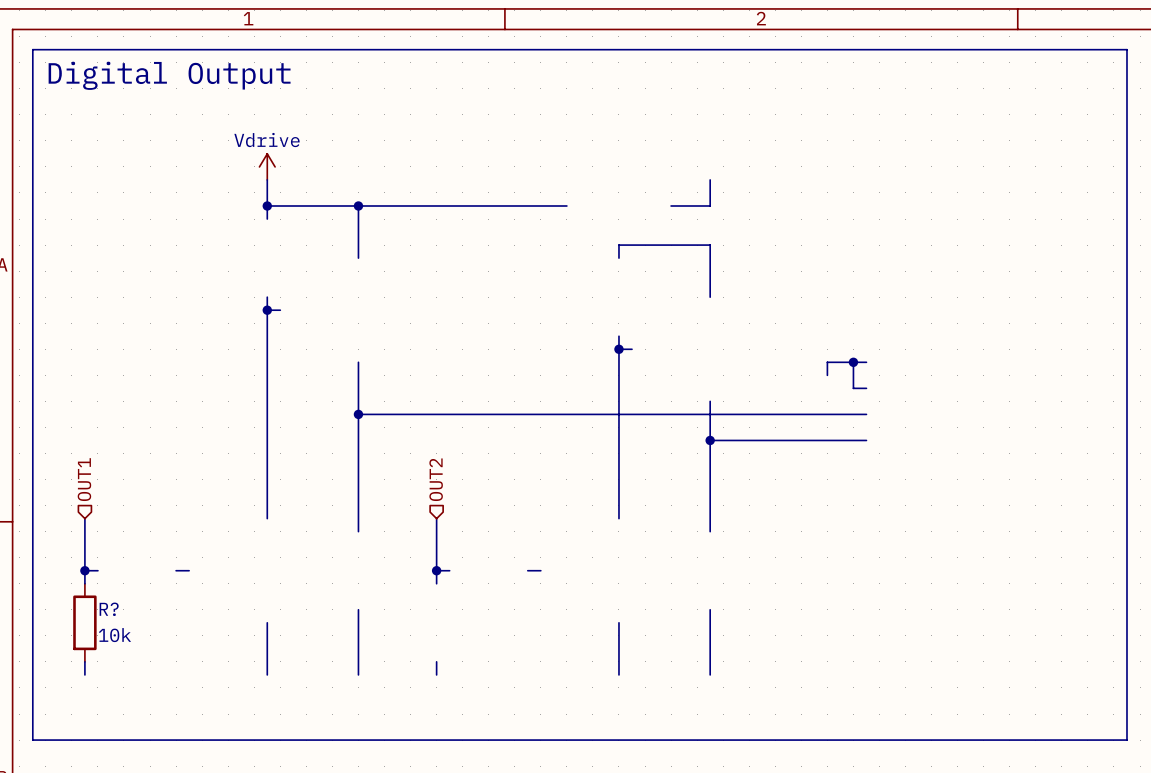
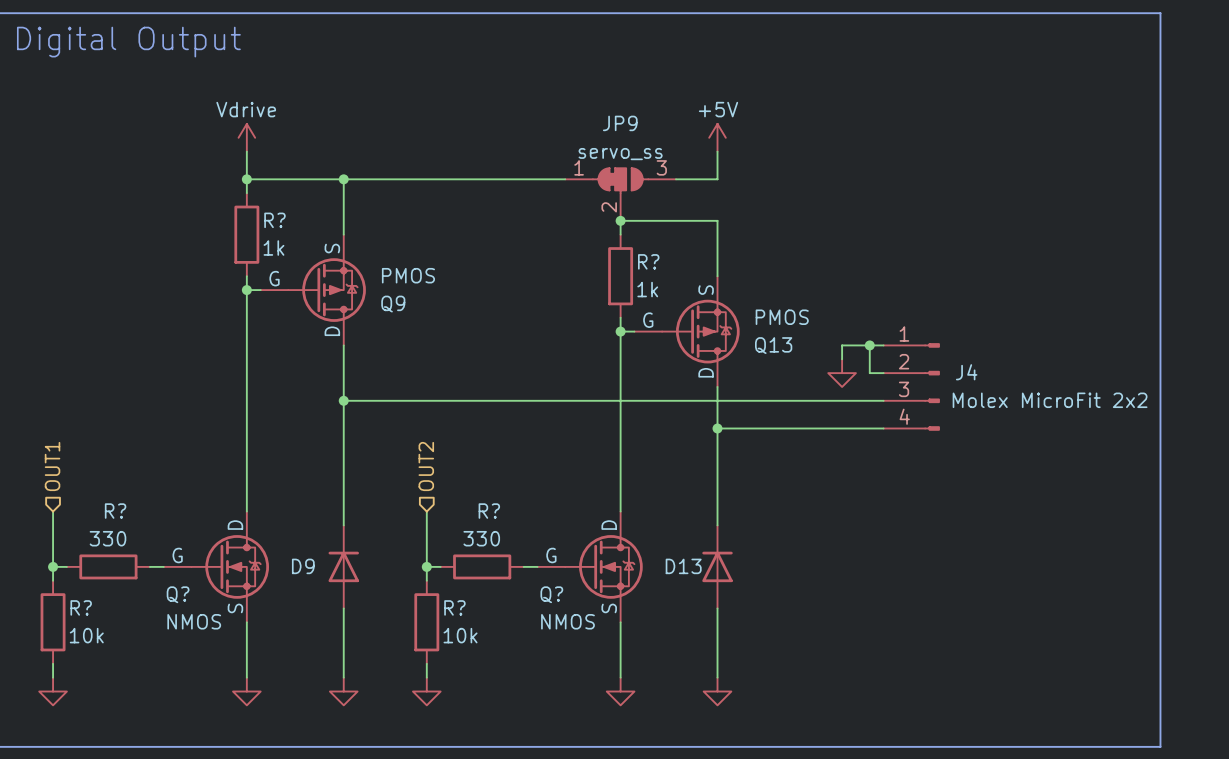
power symbol: none -> +5V (717, 137)
JP9: none -> servo_ss (620, 194)
junction: none -> (620, 220)
R?: none -> 1k (246, 234)
R?: none -> 1k (620, 276)
Q9: none -> PMOS (313, 290)
Q13: none -> PMOS (687, 331)
power symbol: none -> (842, 373)
J4: none -> Molex MicroFit 2x2 (911, 386)
R?: none -> 330 (108, 566)
Q?: none -> NMOS (216, 566)
D9: none -> (343, 566)
R?: none -> 330 (482, 566)
Q?: none -> NMOS (590, 566)
D13: none -> (717, 566)
R?: none -> 10k (426, 622)
power symbol: none -> (53, 691)
power symbol: none -> (246, 691)
power symbol: none -> (343, 691)
power symbol: none -> (426, 691)
power symbol: none -> (620, 691)
power symbol: none -> (717, 691)

